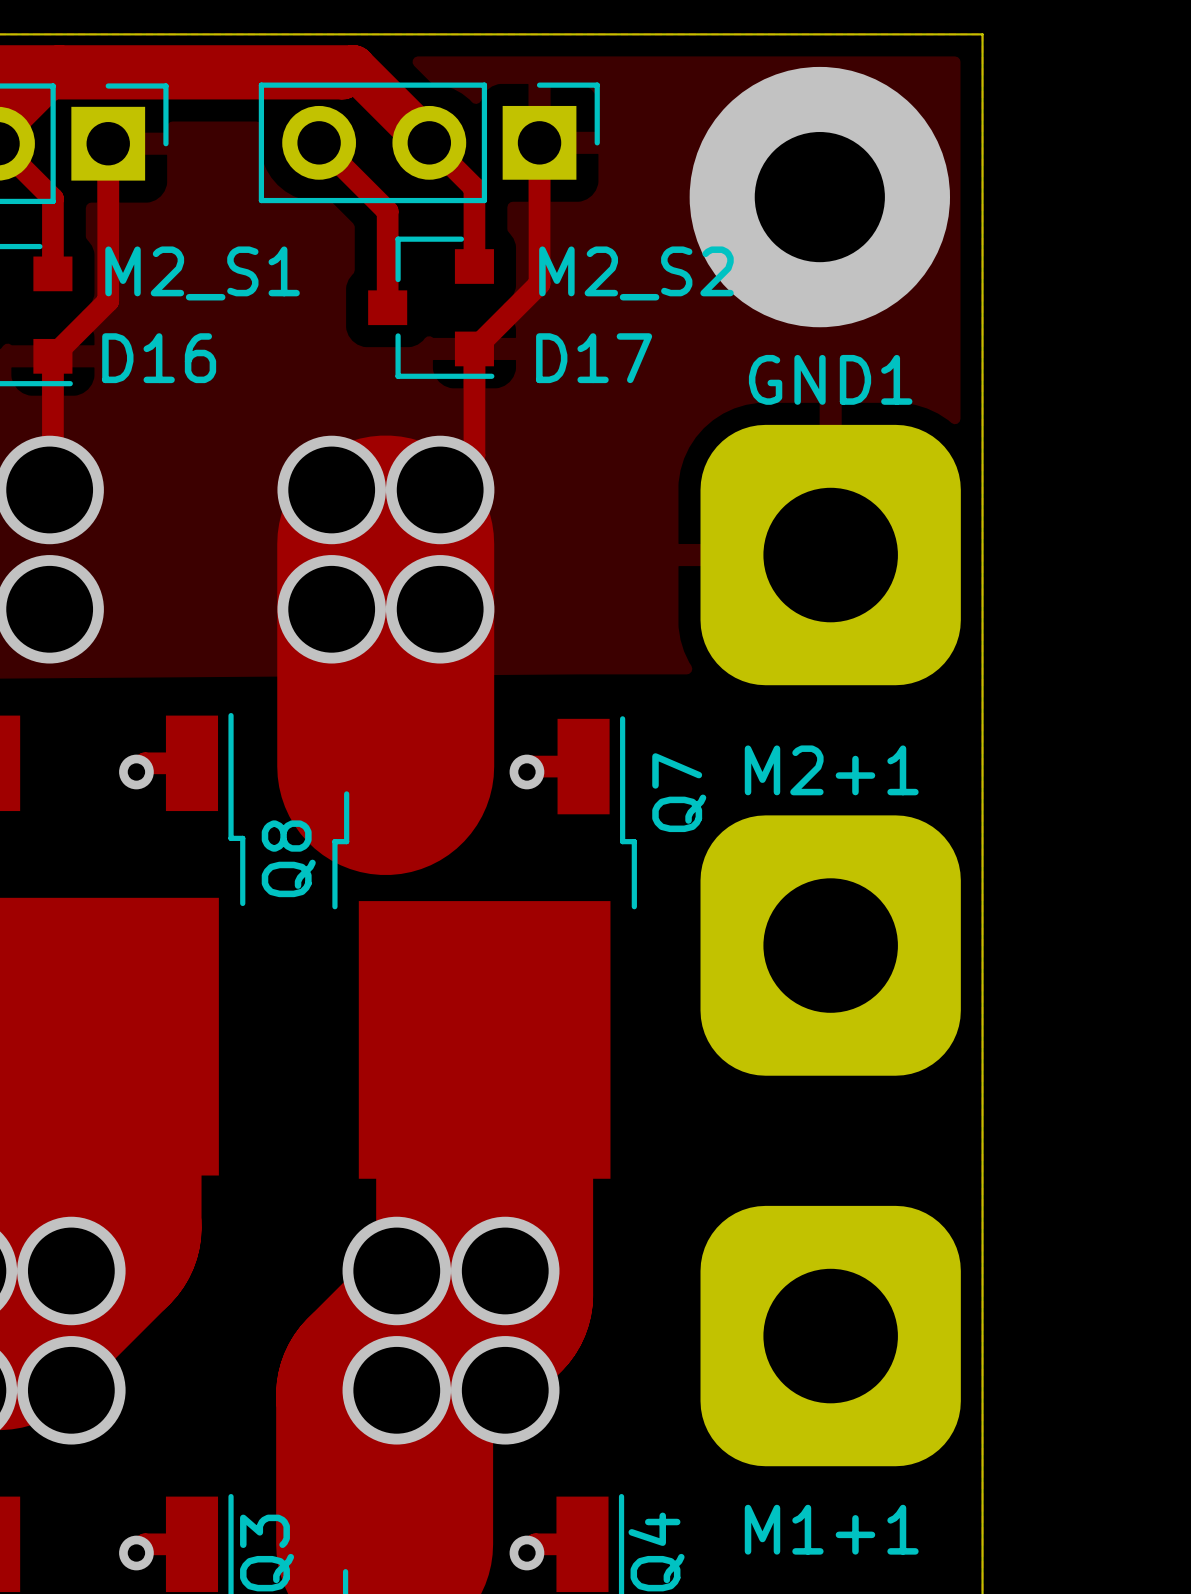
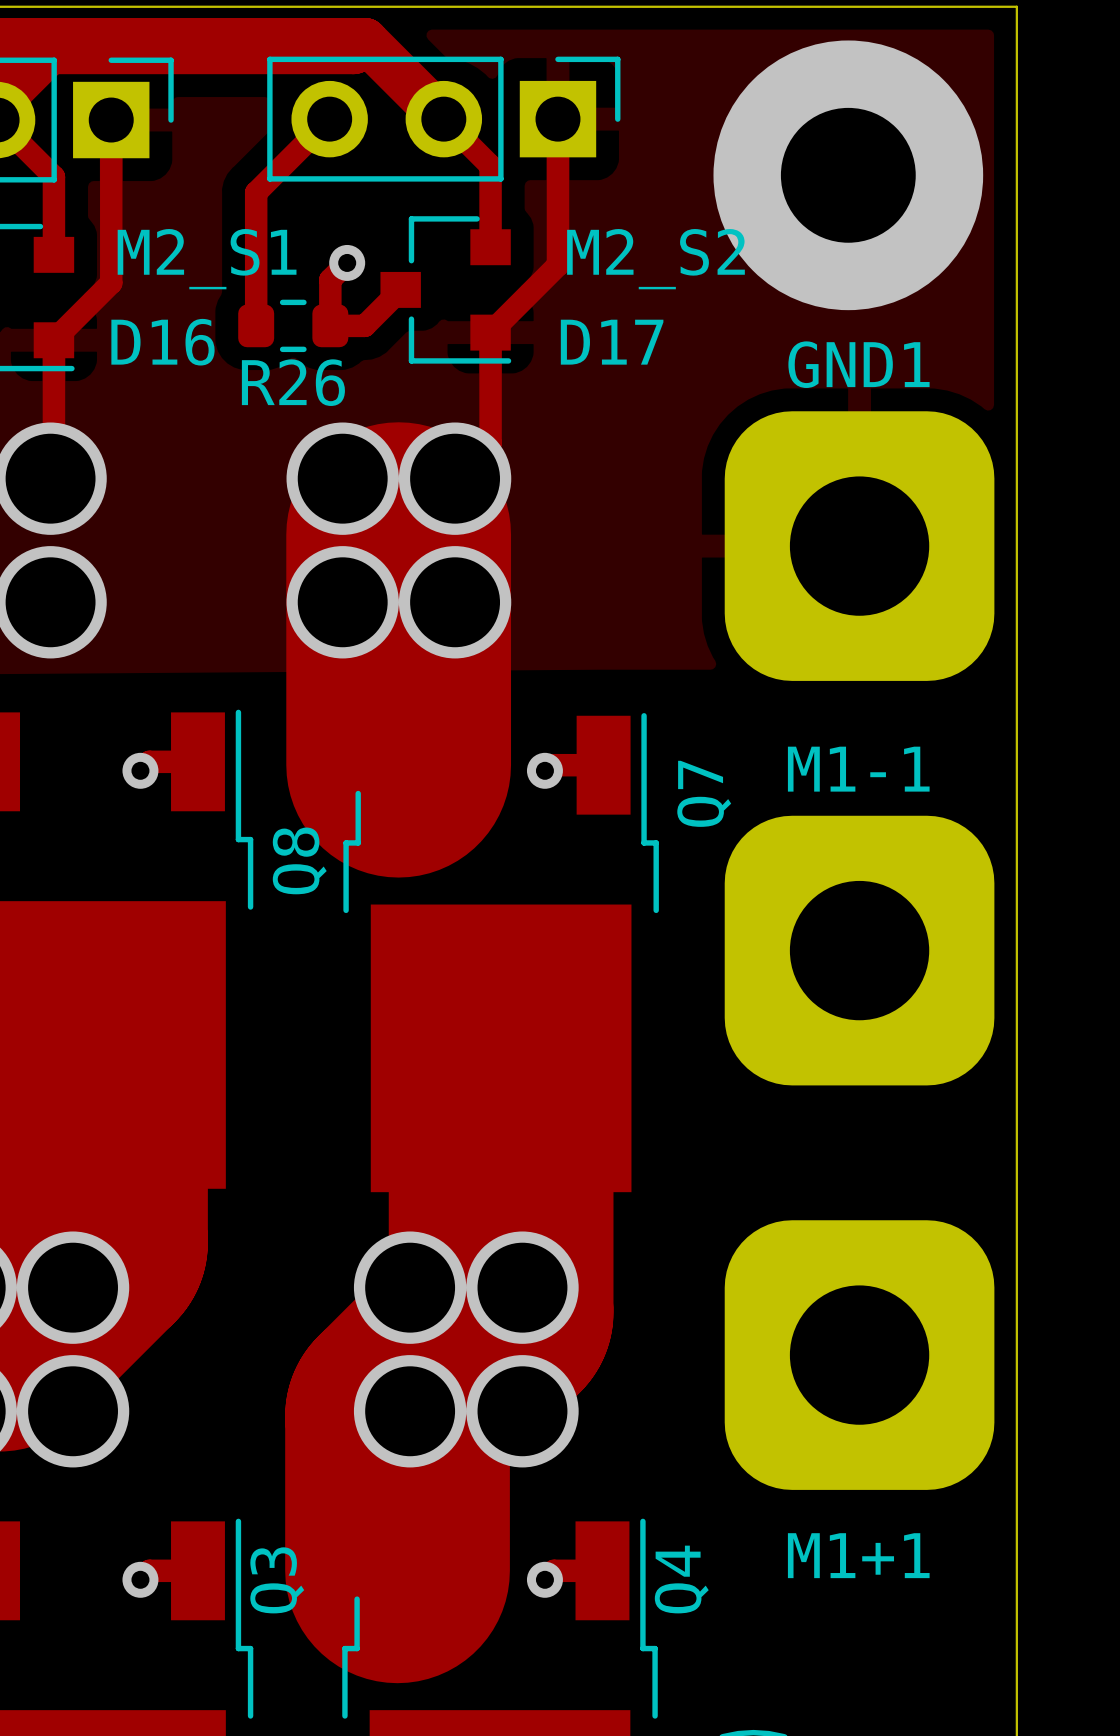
track: (319, 142) (387, 211) (387, 307) -> (347, 262) (330, 279) (330, 325) (364, 325) (400, 289)
track: none -> (329, 119) (256, 192) (256, 325)
via: none -> (347, 262)
R26: none -> (293, 325)
M2+1 name: M2+1 (831, 770) -> M1-1 (858, 769)

